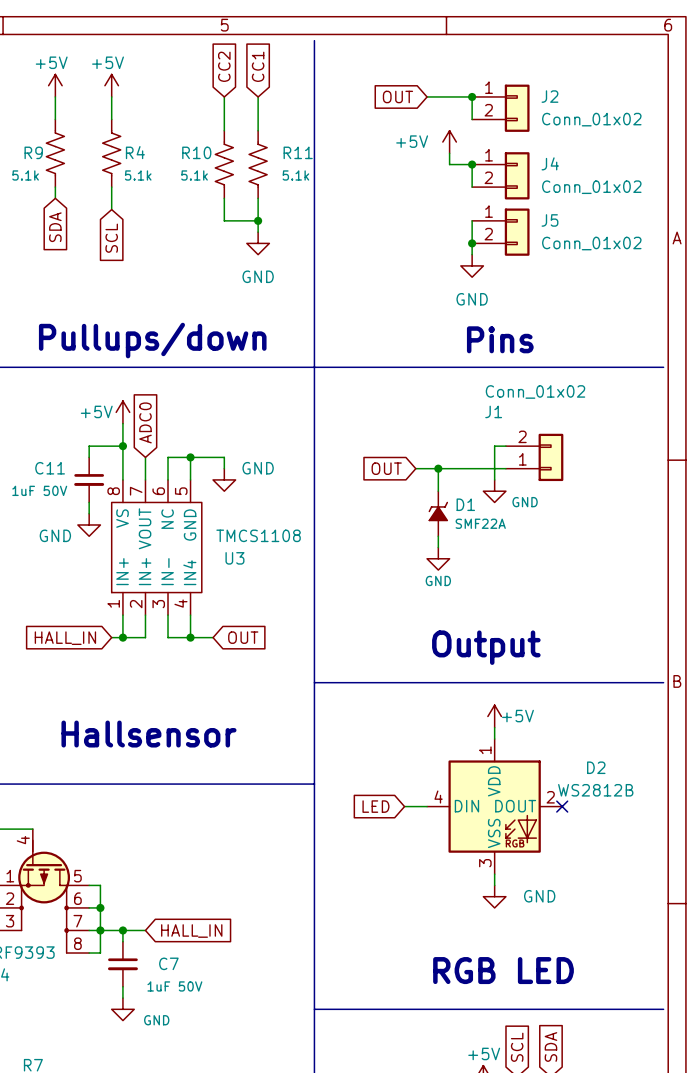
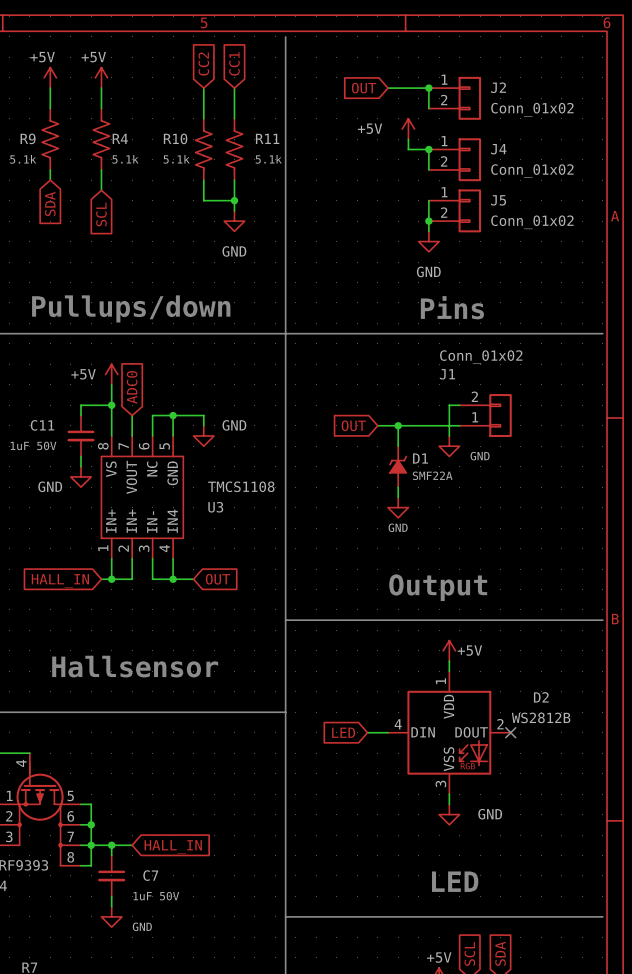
text: RGB LED (503, 970) -> none
text: none -> LED (455, 881)

